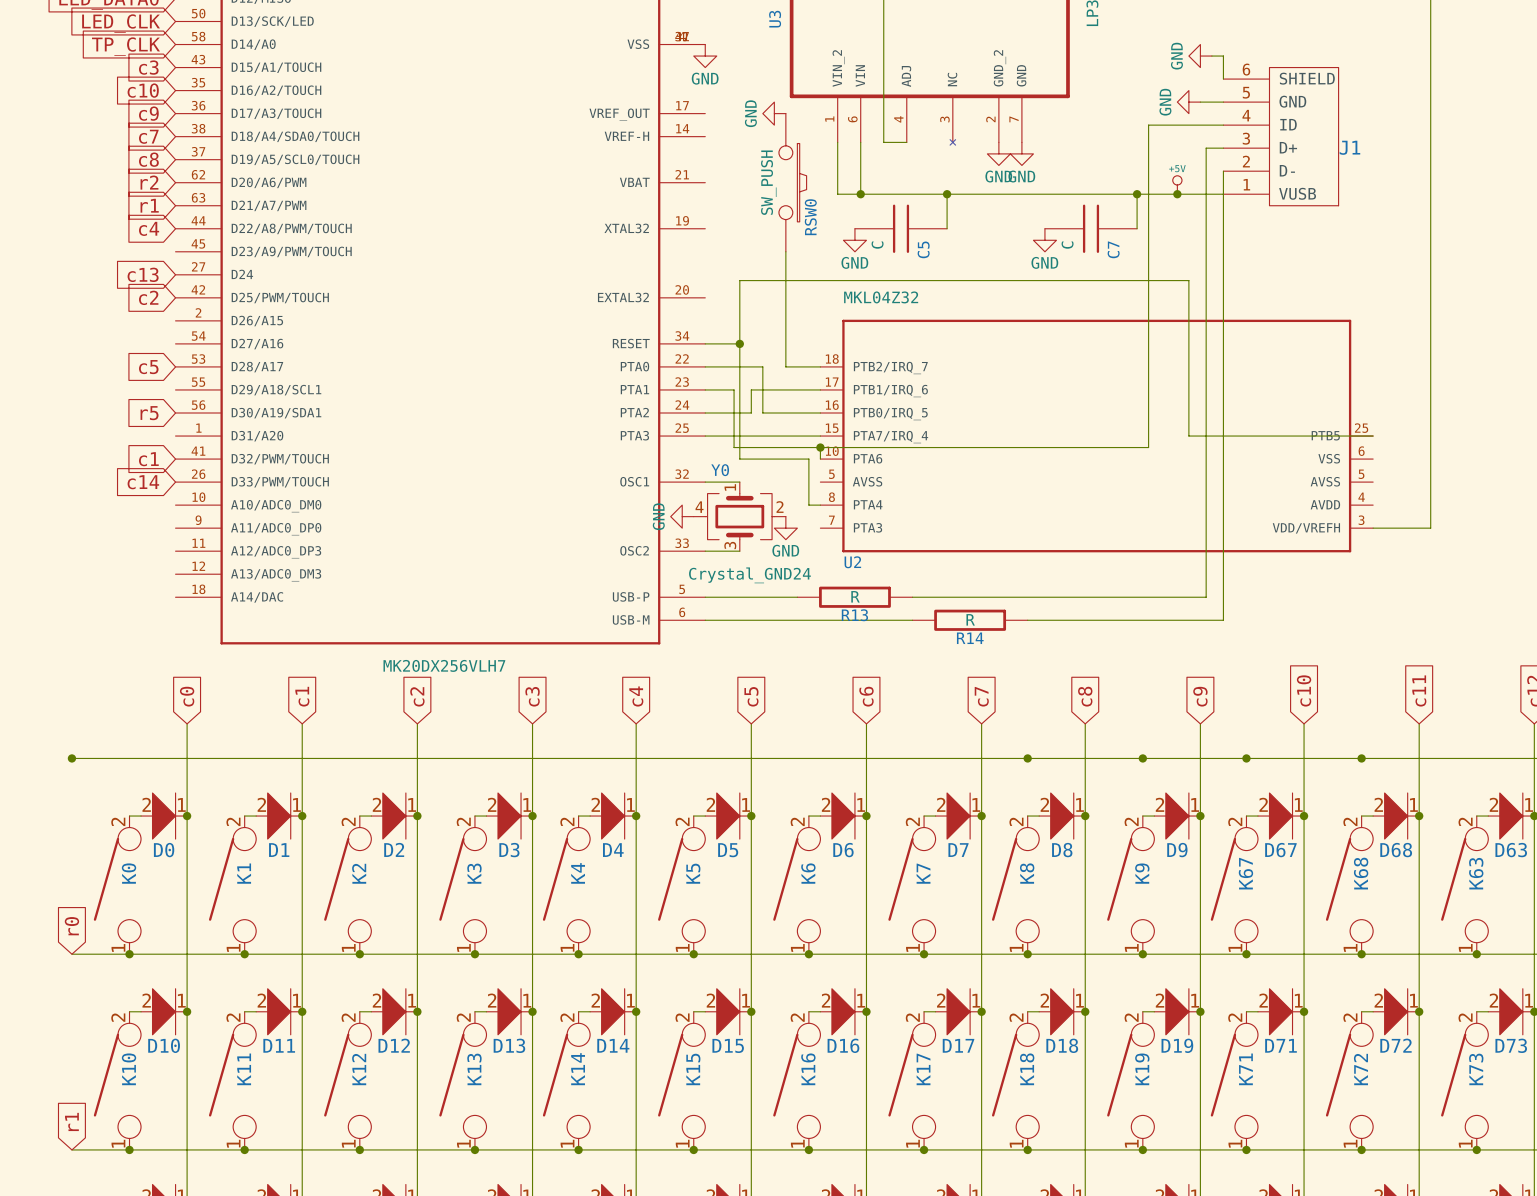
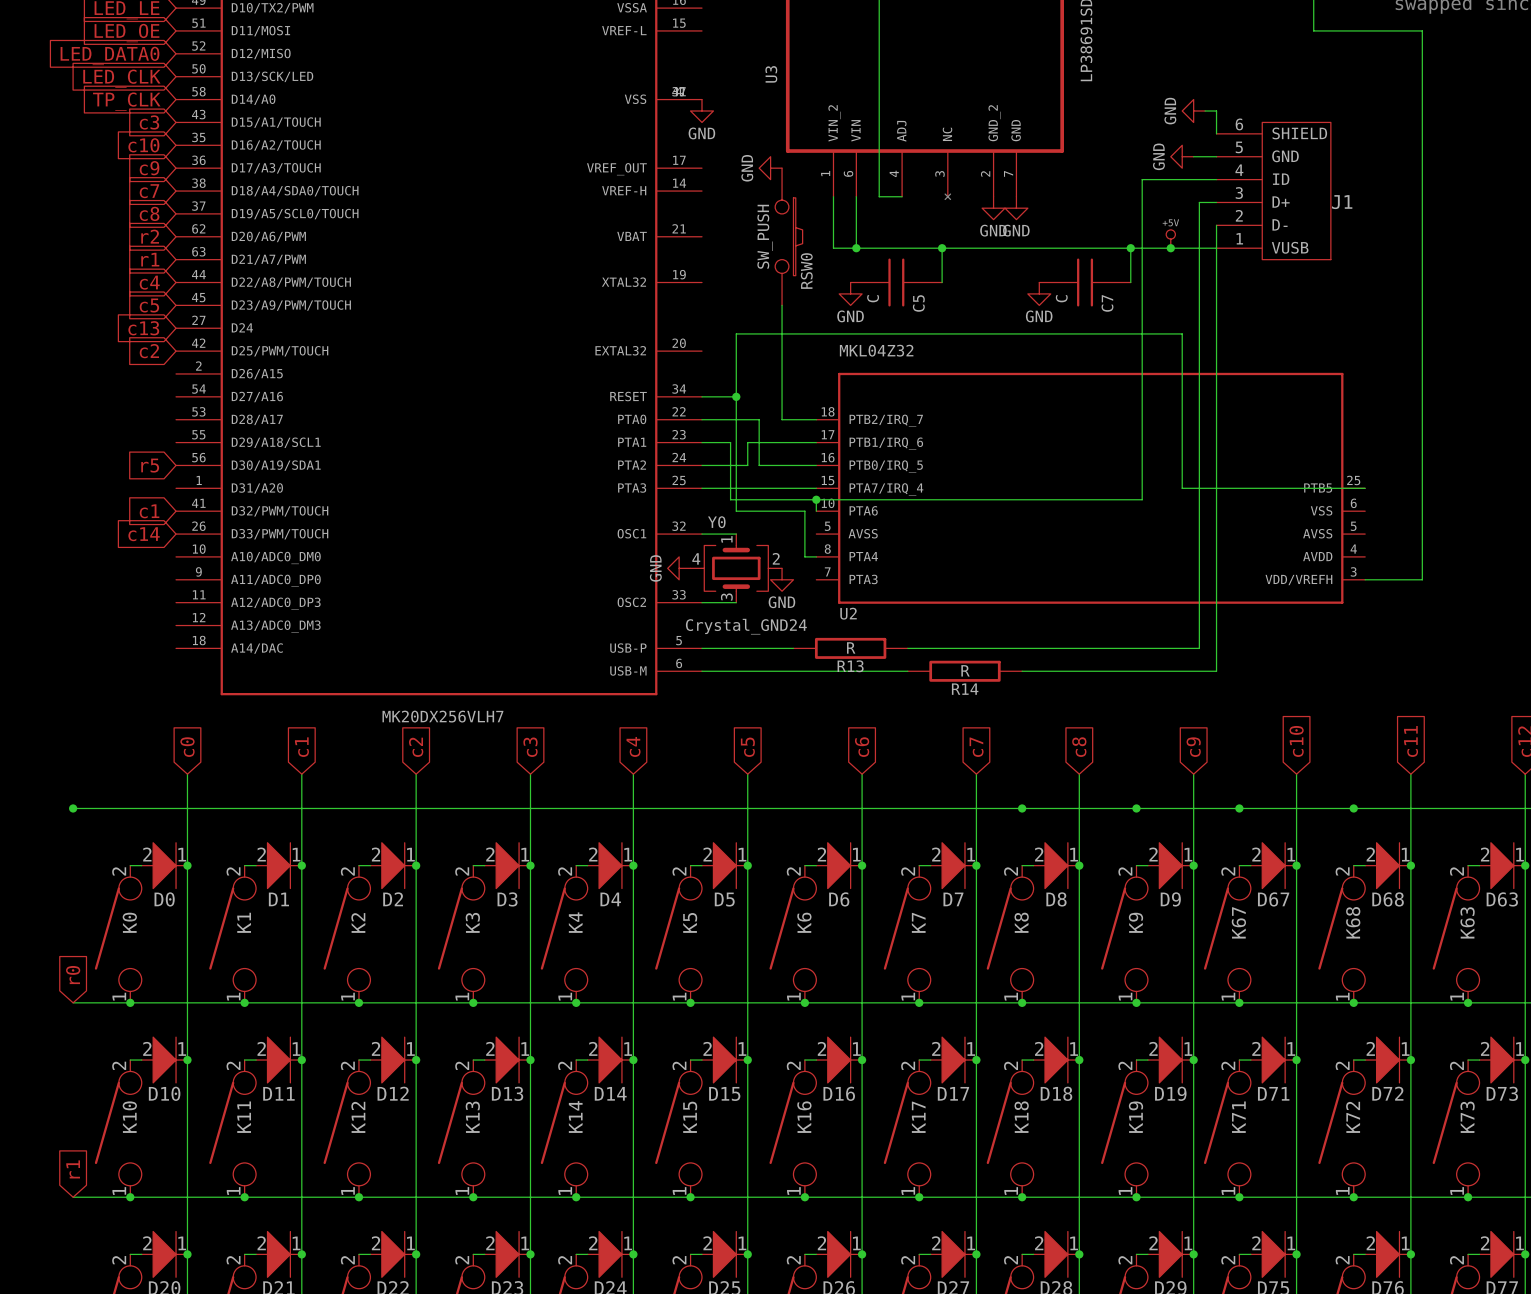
global label position: c5 (148, 367) -> c5 (149, 305)

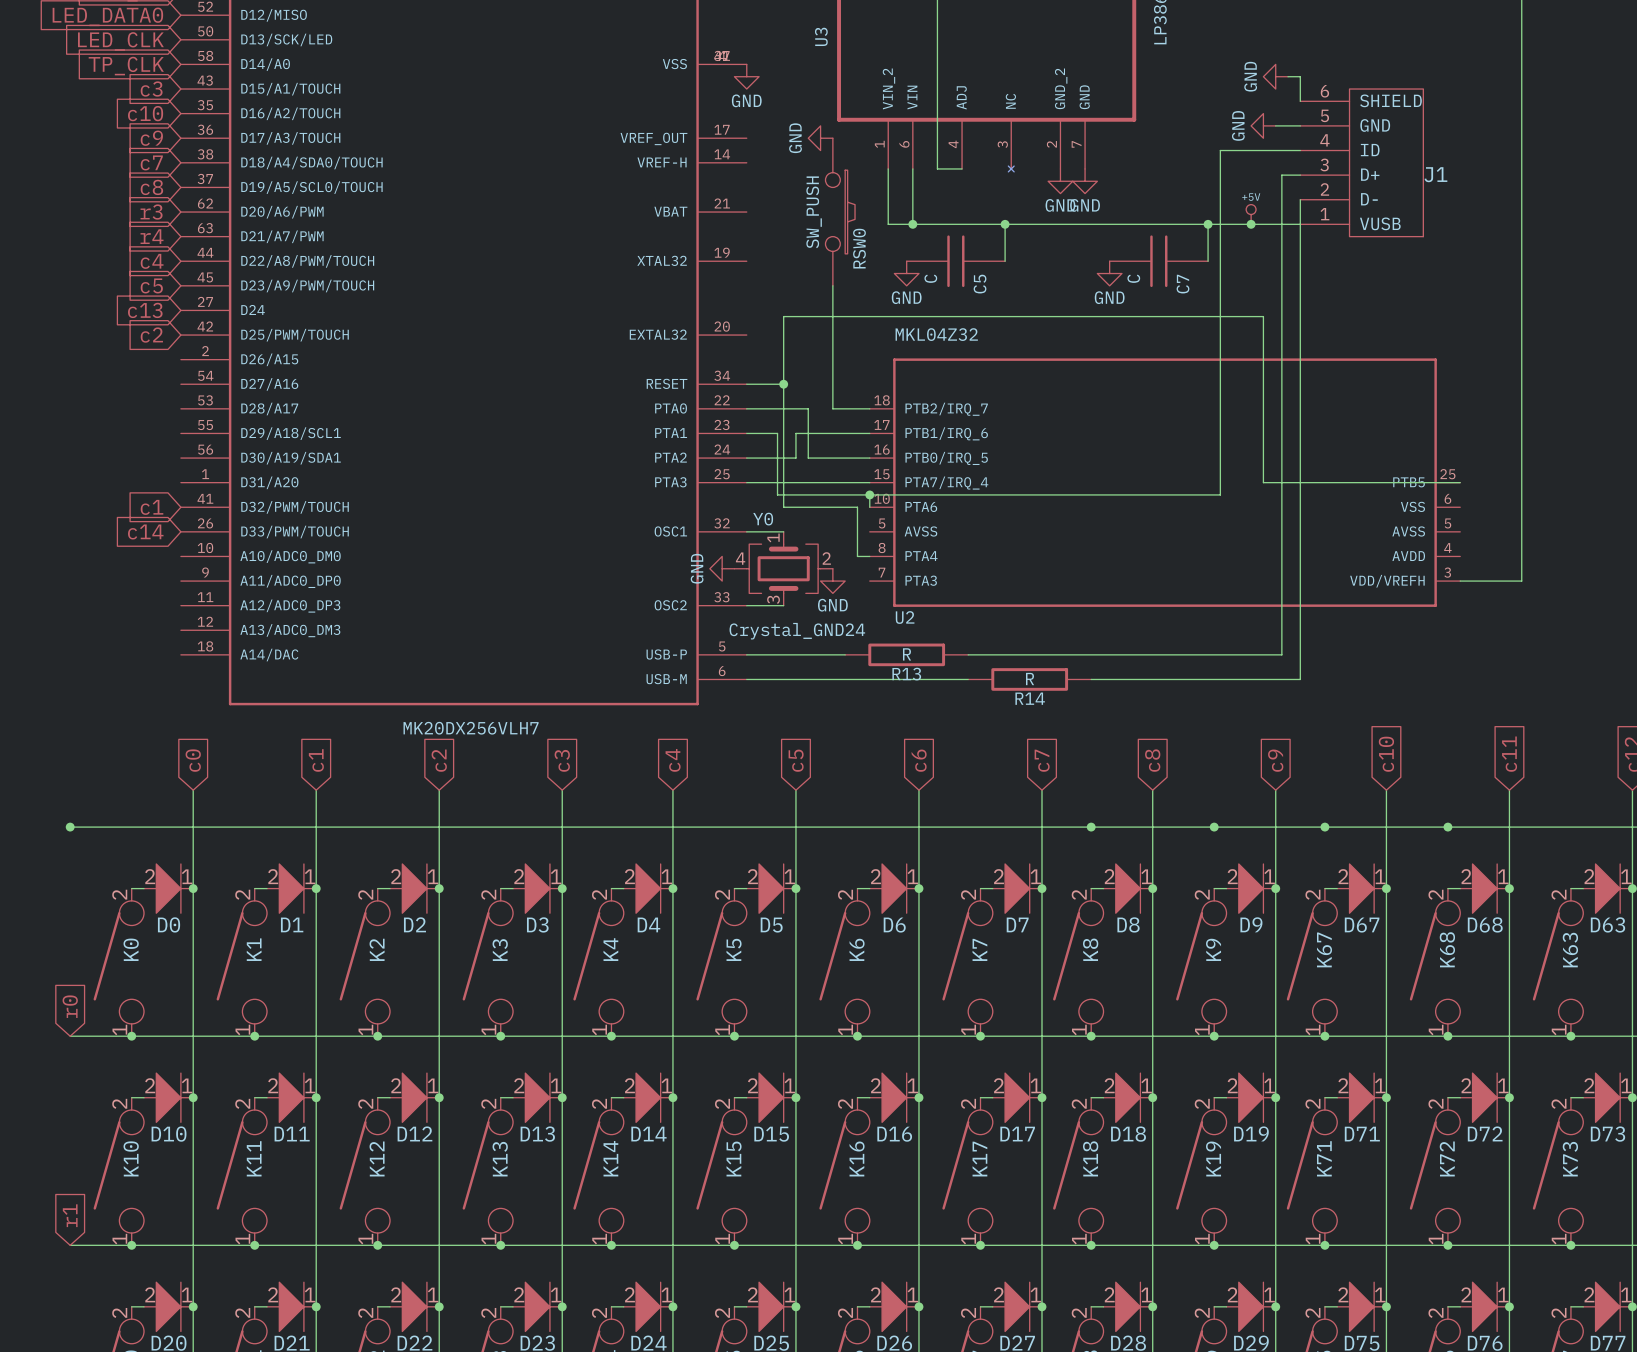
global label: r2 (150, 236) -> r3 (151, 212)
global label: r1 (150, 259) -> r4 (152, 236)
global label: r5 (150, 465) -> none

